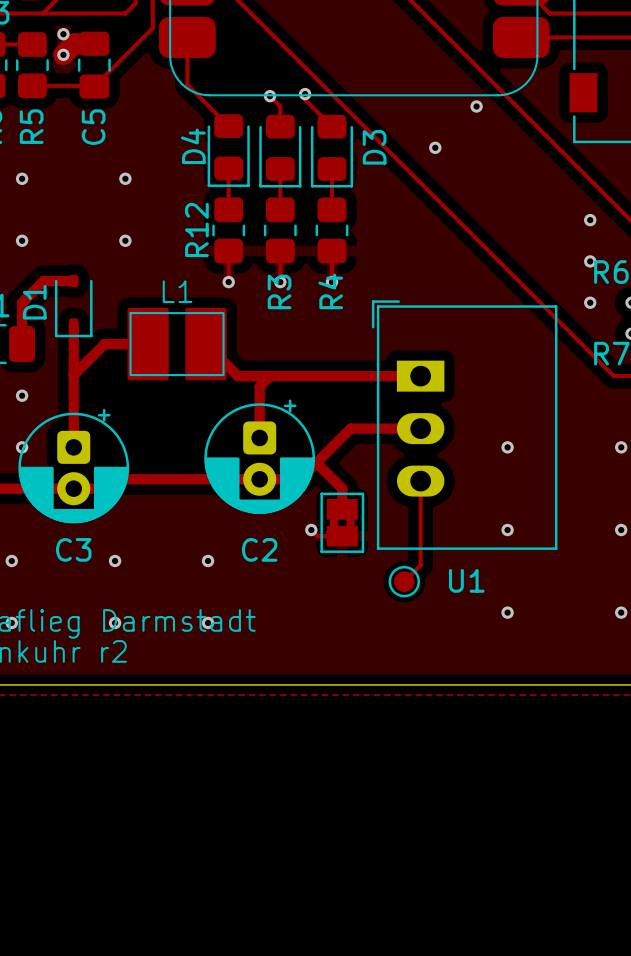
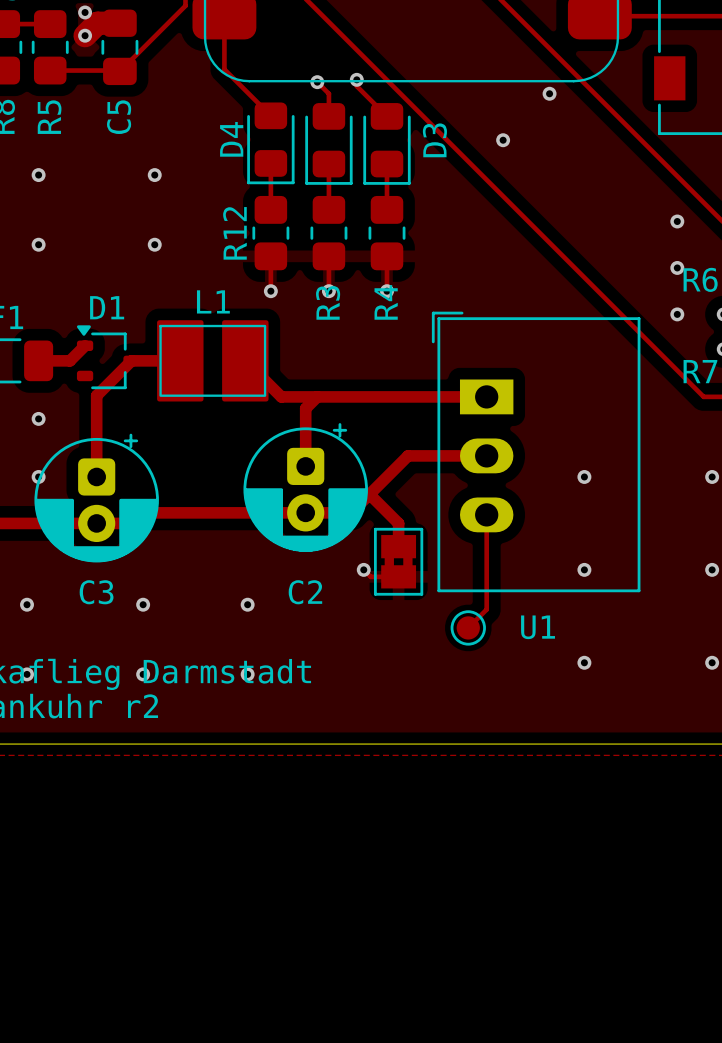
D1 footprint: [54, 274, 93, 338] -> [76, 325, 140, 390]
track: (73, 281) (43, 281) (22, 302) (22, 344) -> (85, 345) (69, 360) (38, 360)
D1 name position: D1 (34, 302) -> D1 (107, 307)
track: (73, 324) (73, 375) -> none

